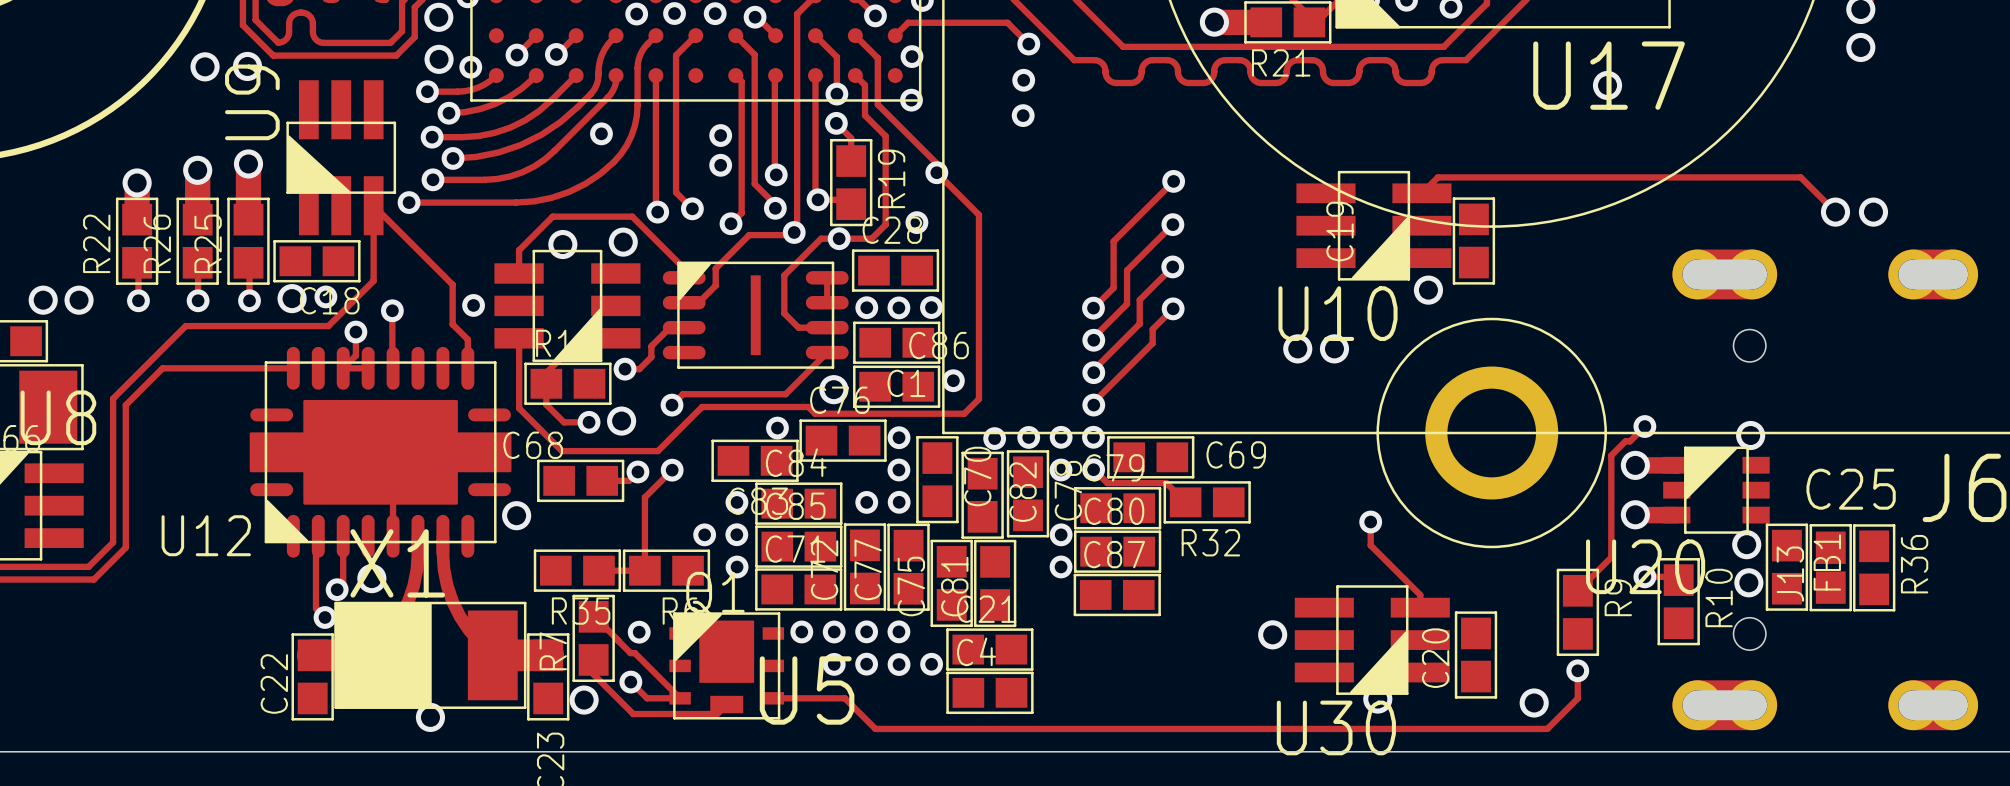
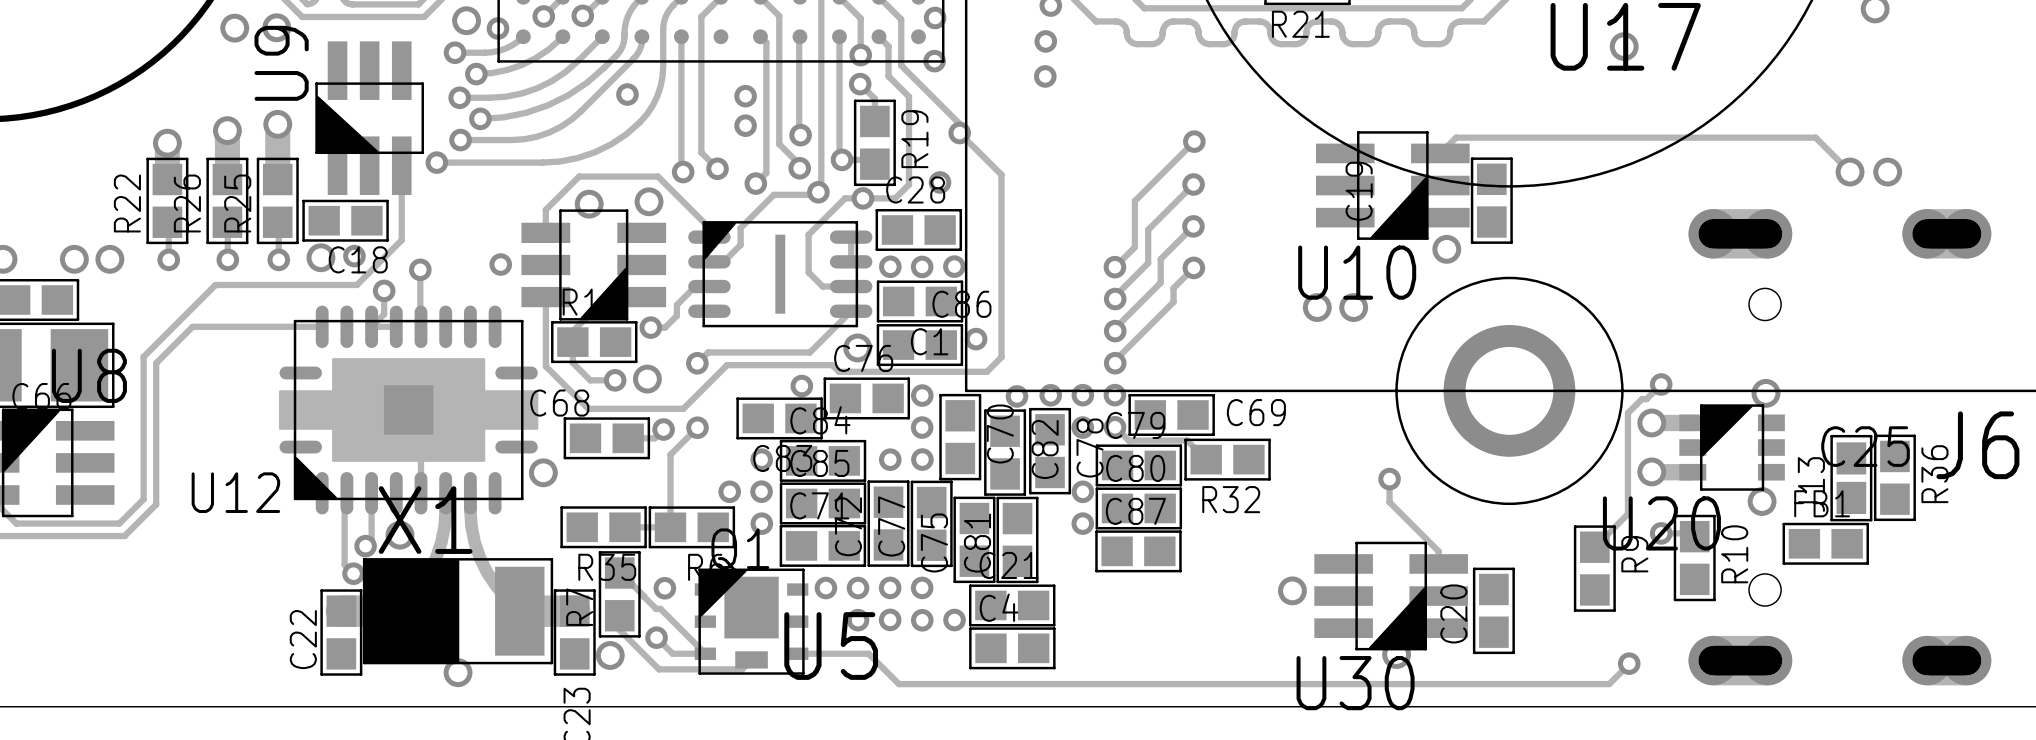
track: (373, 205) (452, 284) (452, 324) (467, 339) (467, 368) -> none
FB1 rotation: 0° (1786, 567) -> 90° clockwise (1825, 543)
J13 position: (1830, 567) -> (1851, 478)
R36 position: (1874, 567) -> (1894, 477)
via: (1748, 582) -> none
track: (1577, 670) (1577, 698) (1547, 728) -> (1629, 664) (1609, 684) (1564, 684)
via position: (1577, 670) -> (1629, 663)
via: (1534, 702) -> none

